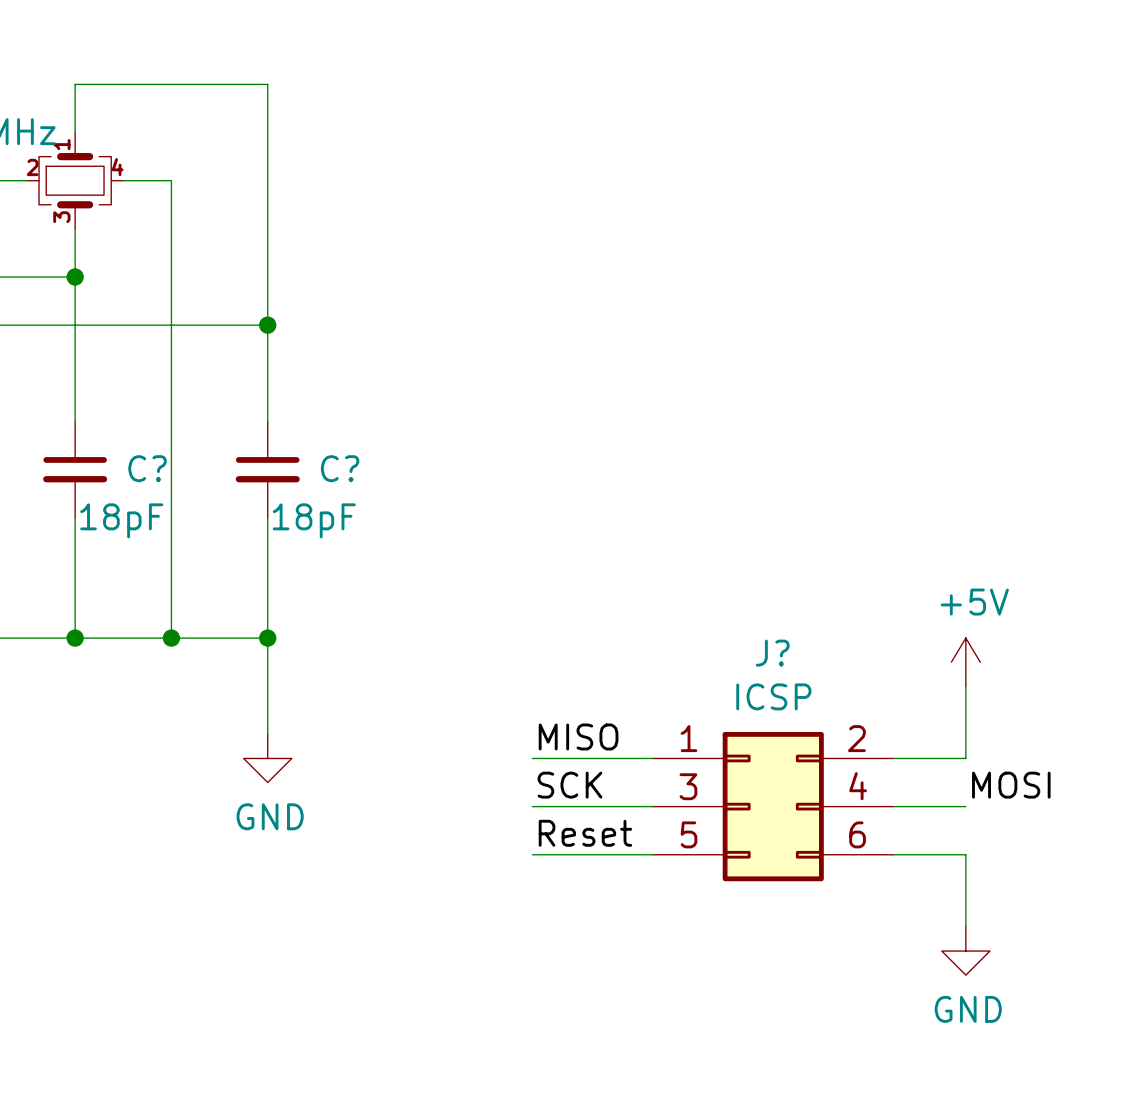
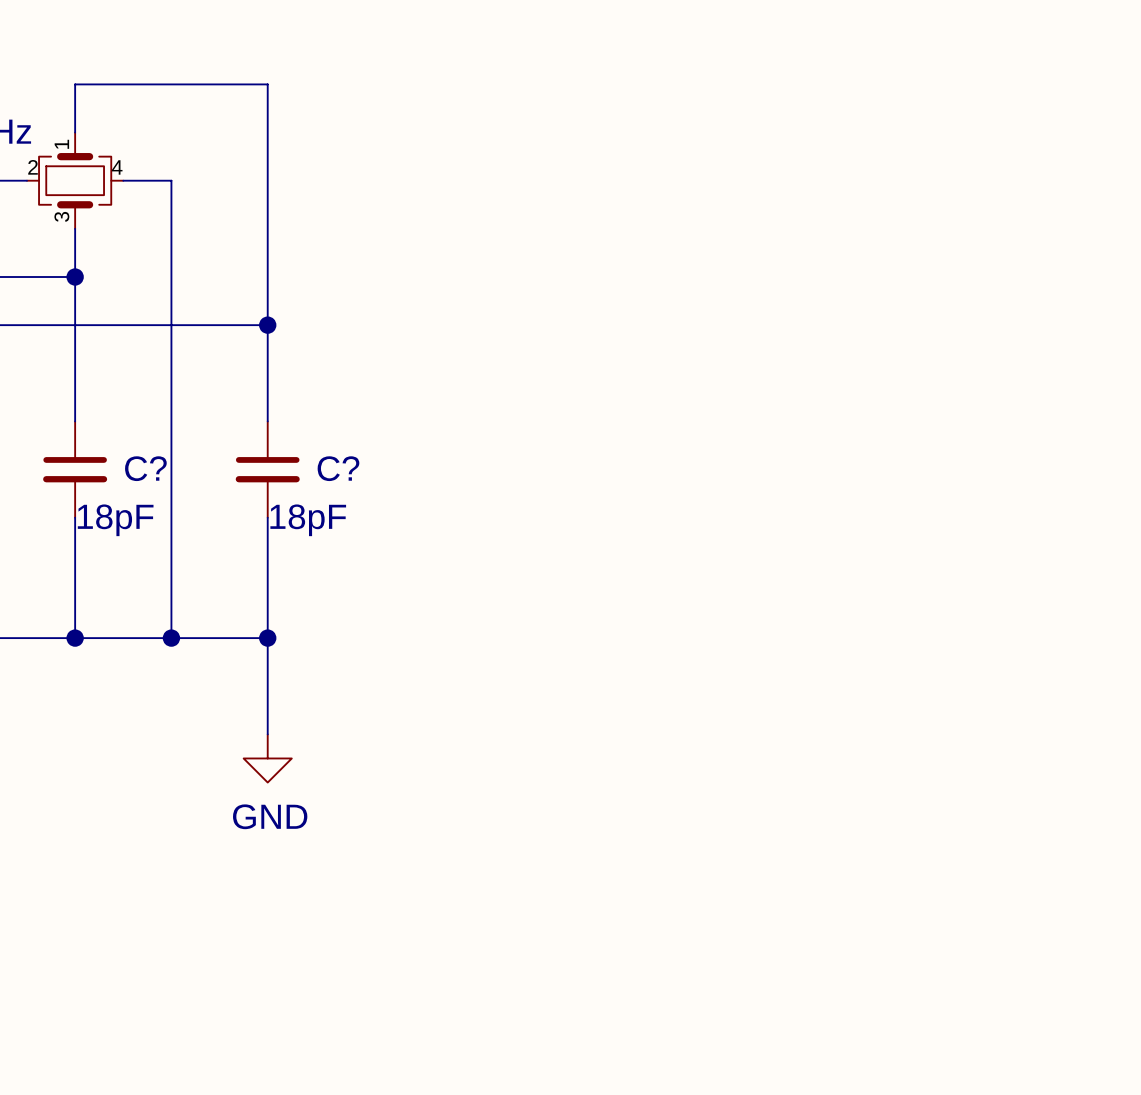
power symbol: +5V (965, 662) -> none
wire: (965, 686) (965, 758) (893, 758) -> none
label: MISO (578, 736) -> none
wire: (532, 758) (652, 758) -> none
label: SCK (569, 785) -> none
label: MOSI (1011, 785) -> none
wire: (532, 806) (652, 806) -> none
J?: ICSP (773, 806) -> none
wire: (893, 806) (965, 806) -> none
label: Reset (585, 833) -> none
wire: (532, 854) (652, 854) -> none
wire: (893, 854) (965, 854) (965, 926) -> none
power symbol: GND (965, 951) -> none

